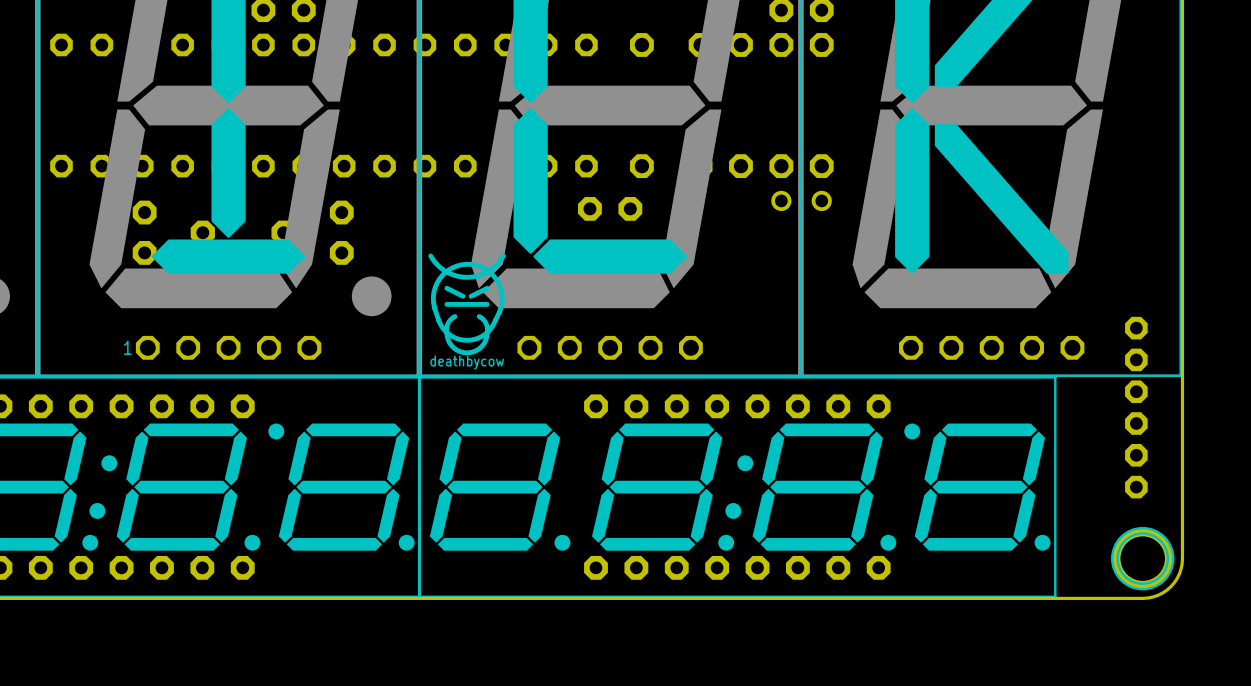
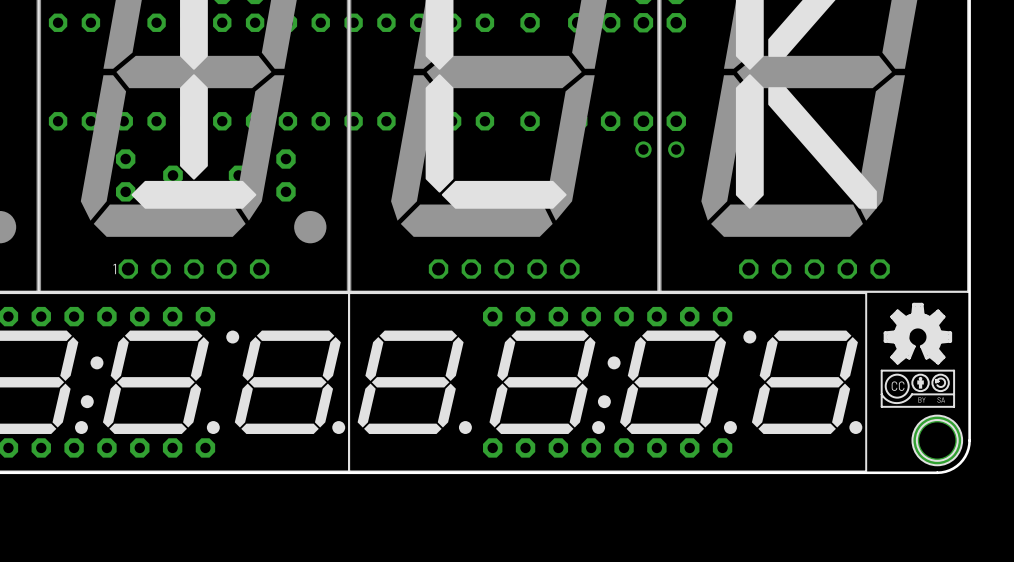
part: (610, 208) -> none
drawing: [428, 253, 506, 356] -> none
drawing: none -> [880, 302, 956, 408]
part: (1136, 407) -> none

